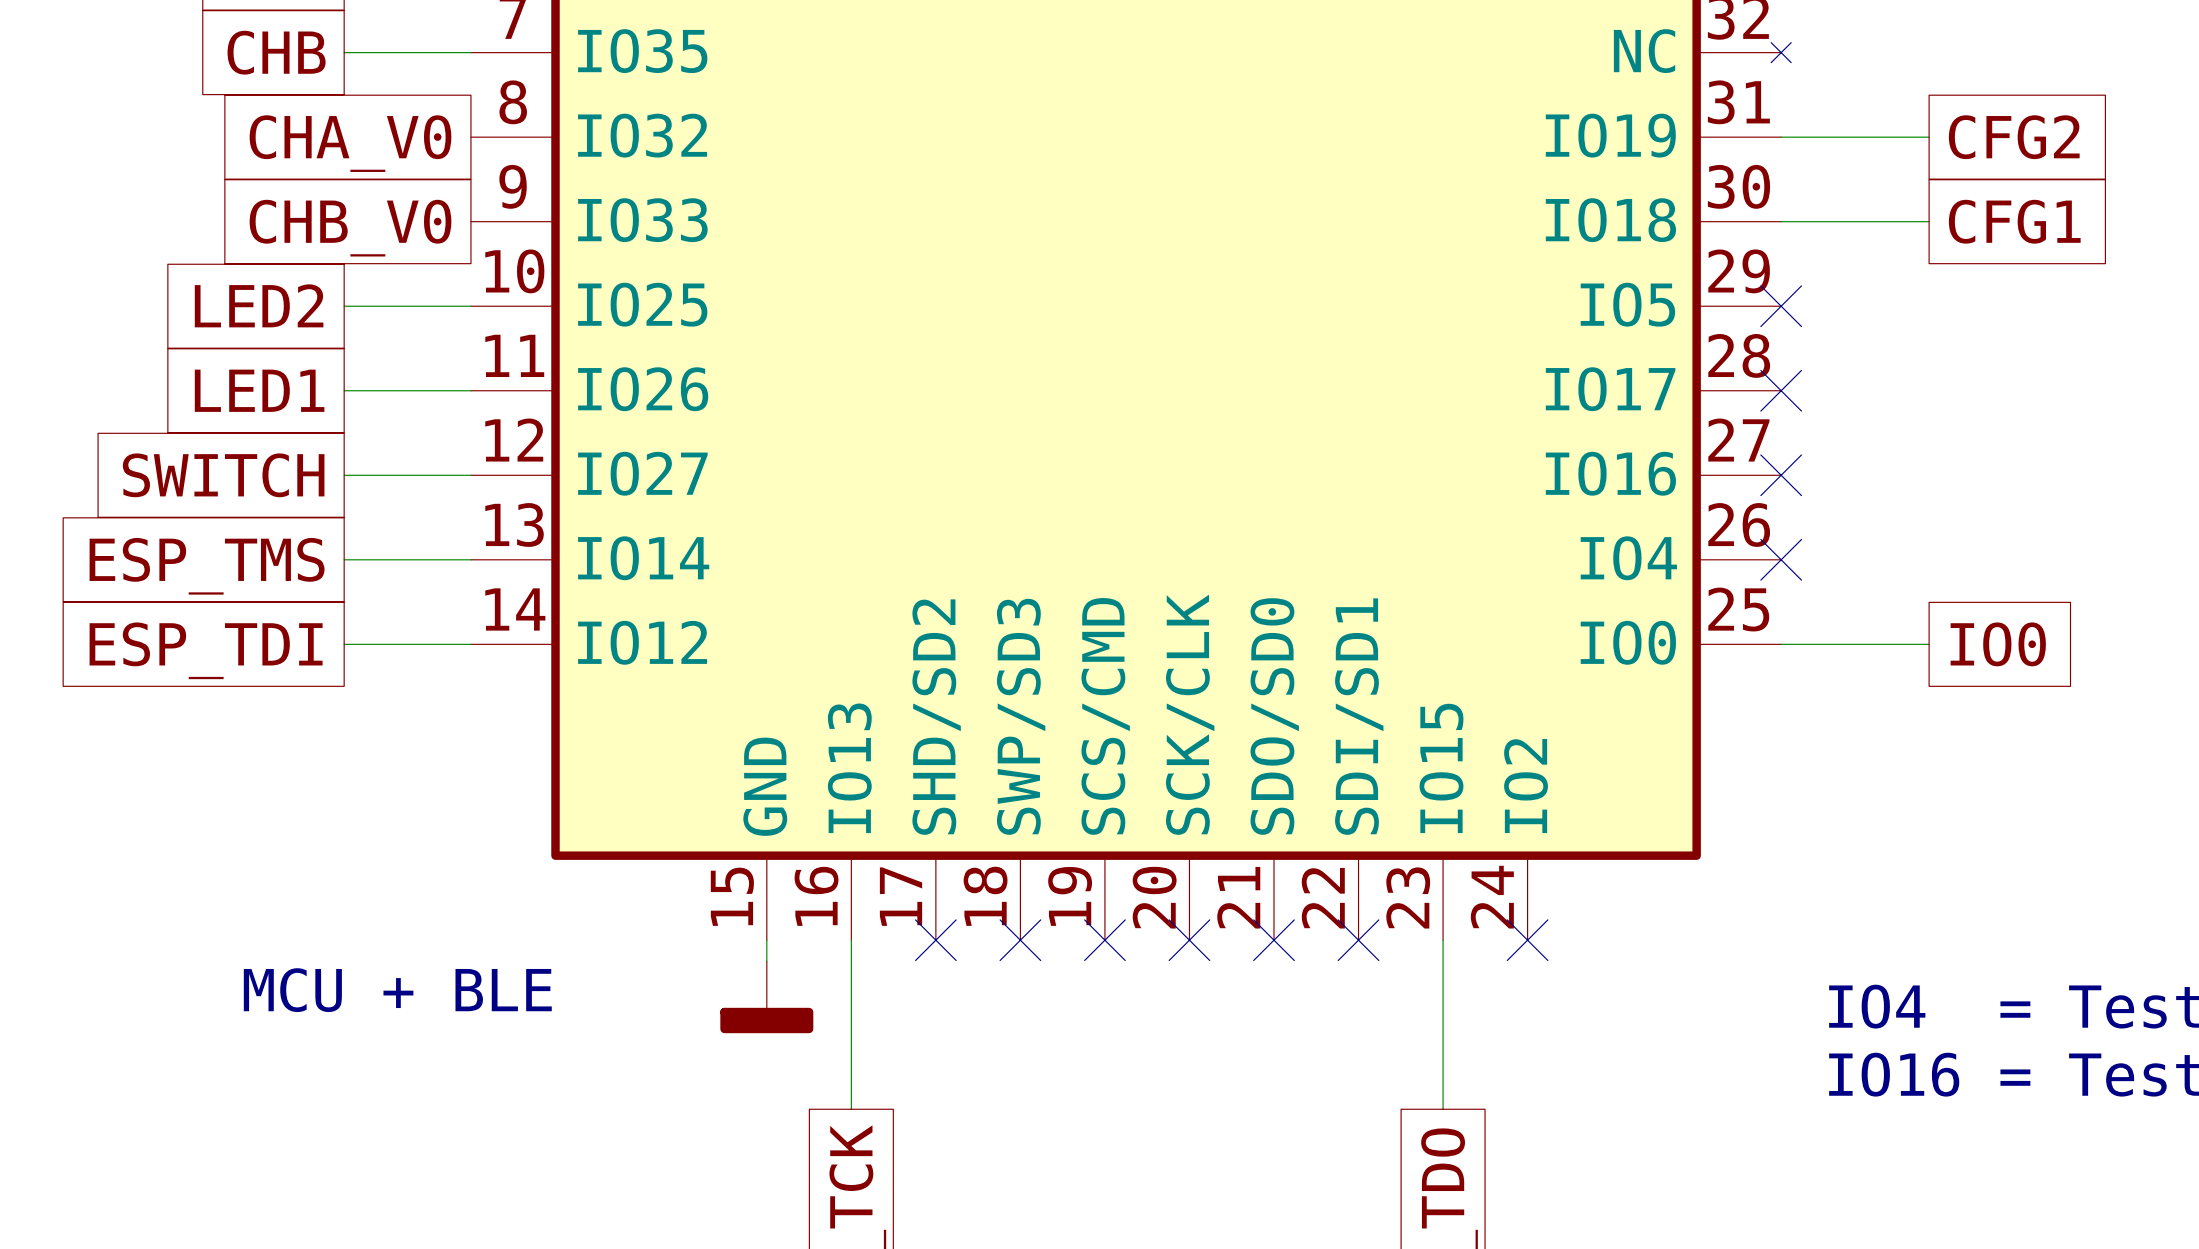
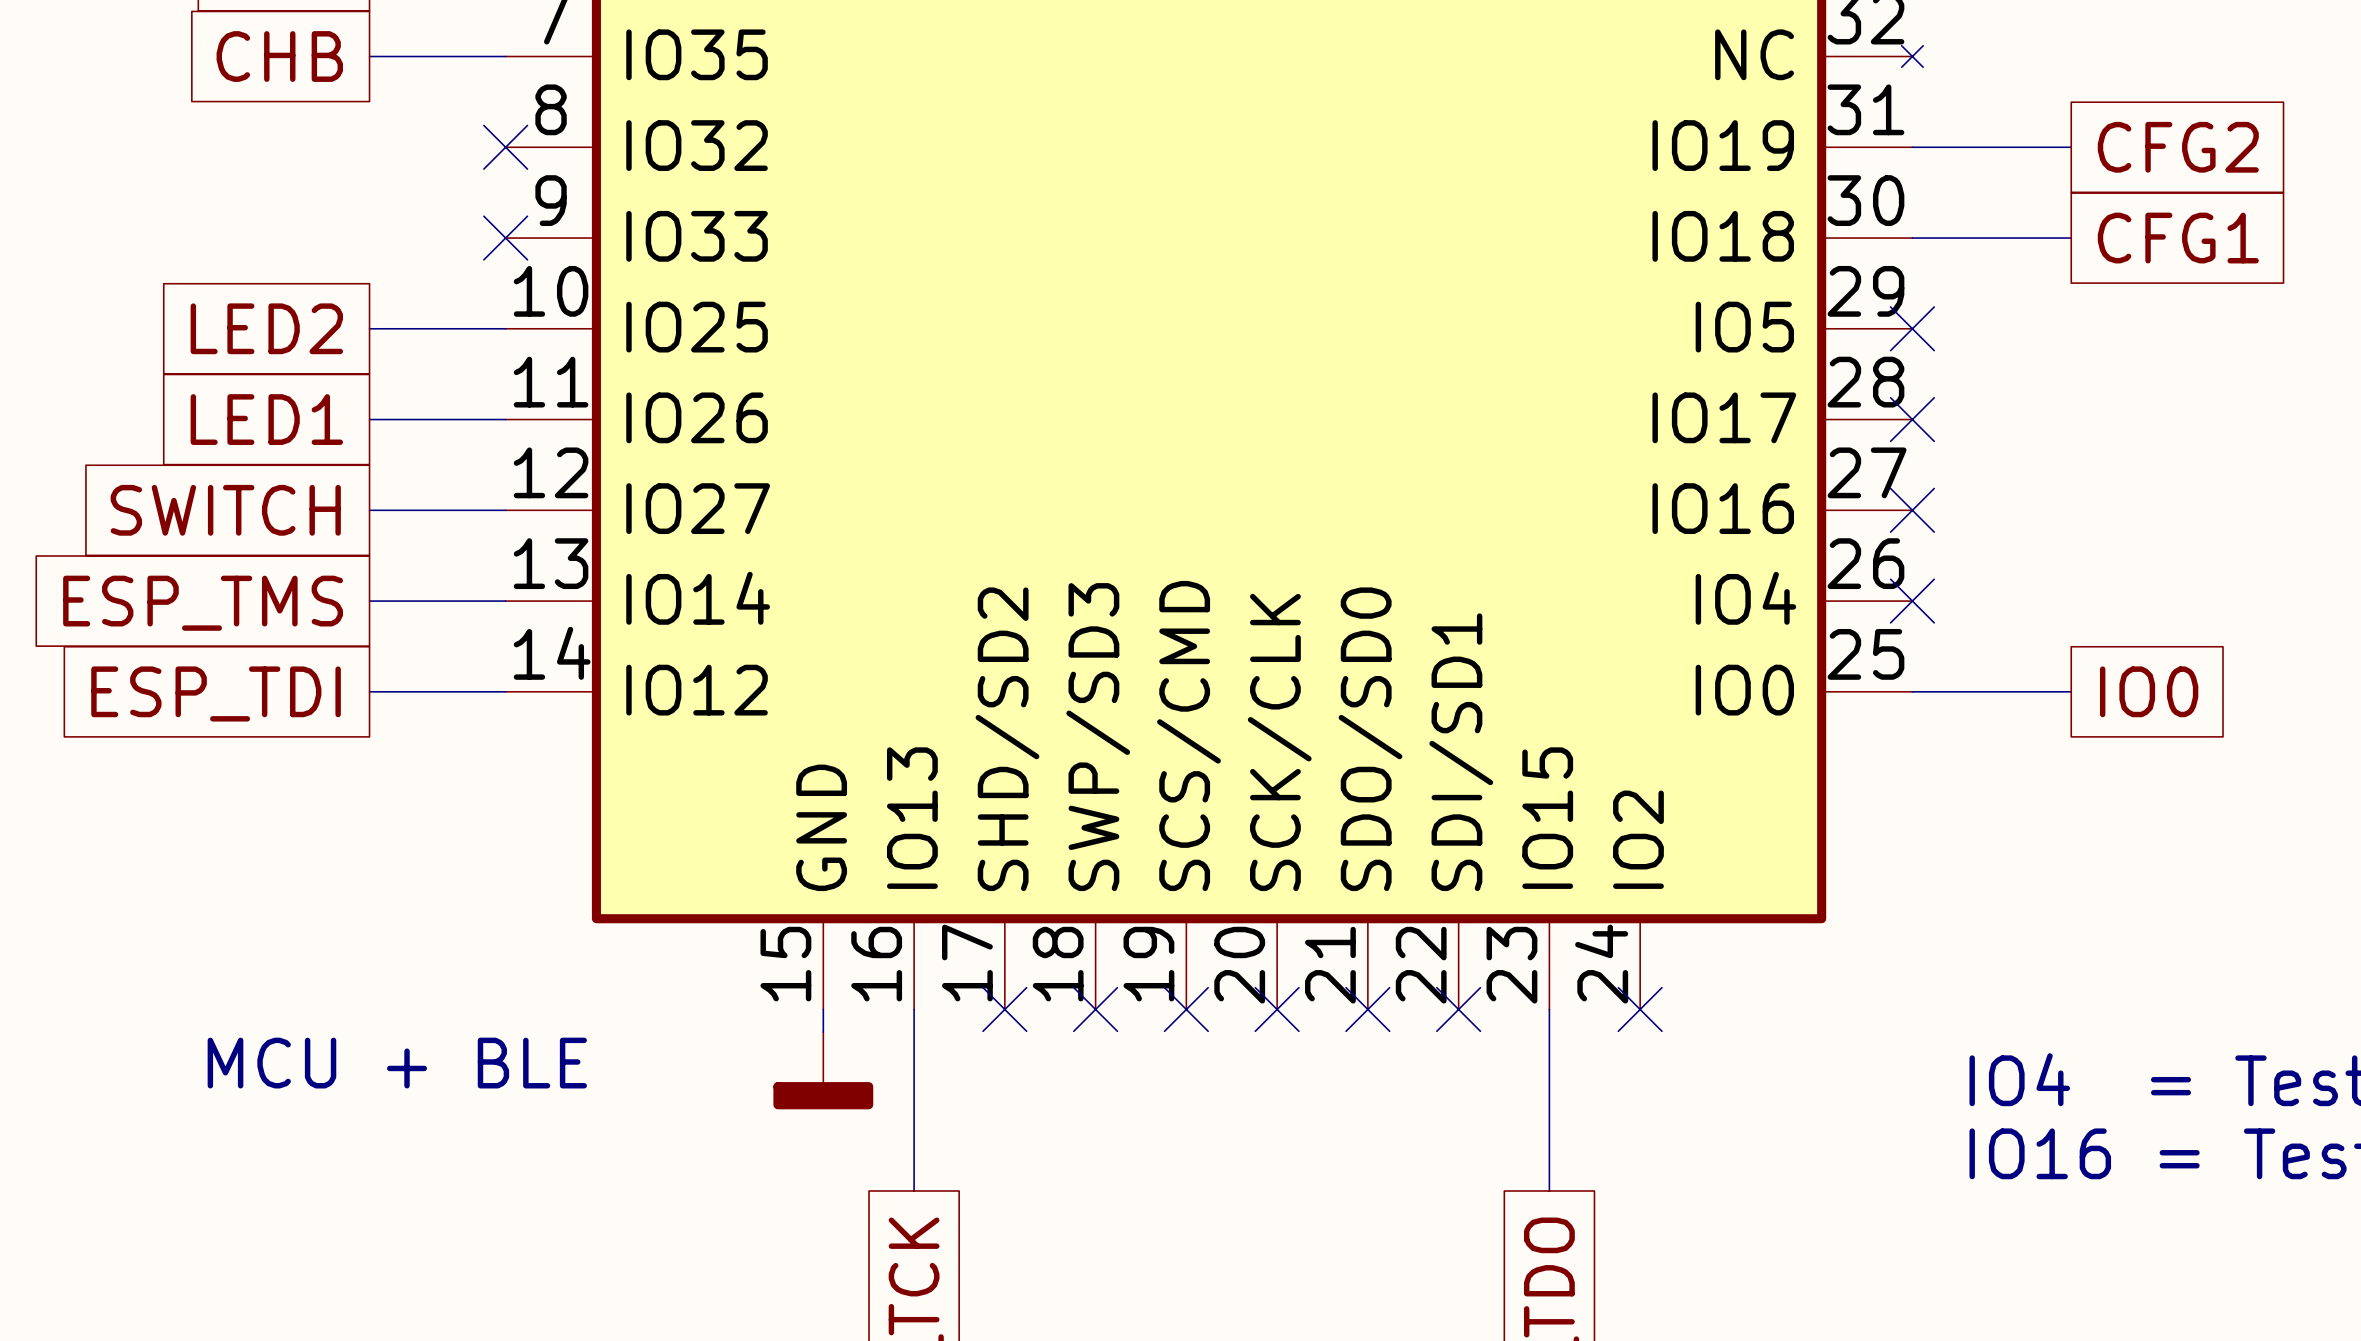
no-connect mark: none -> (505, 147)
global label: CHA_V0 (350, 143) -> none
no-connect mark: none -> (505, 238)
global label: CHB_V0 (350, 228) -> none

